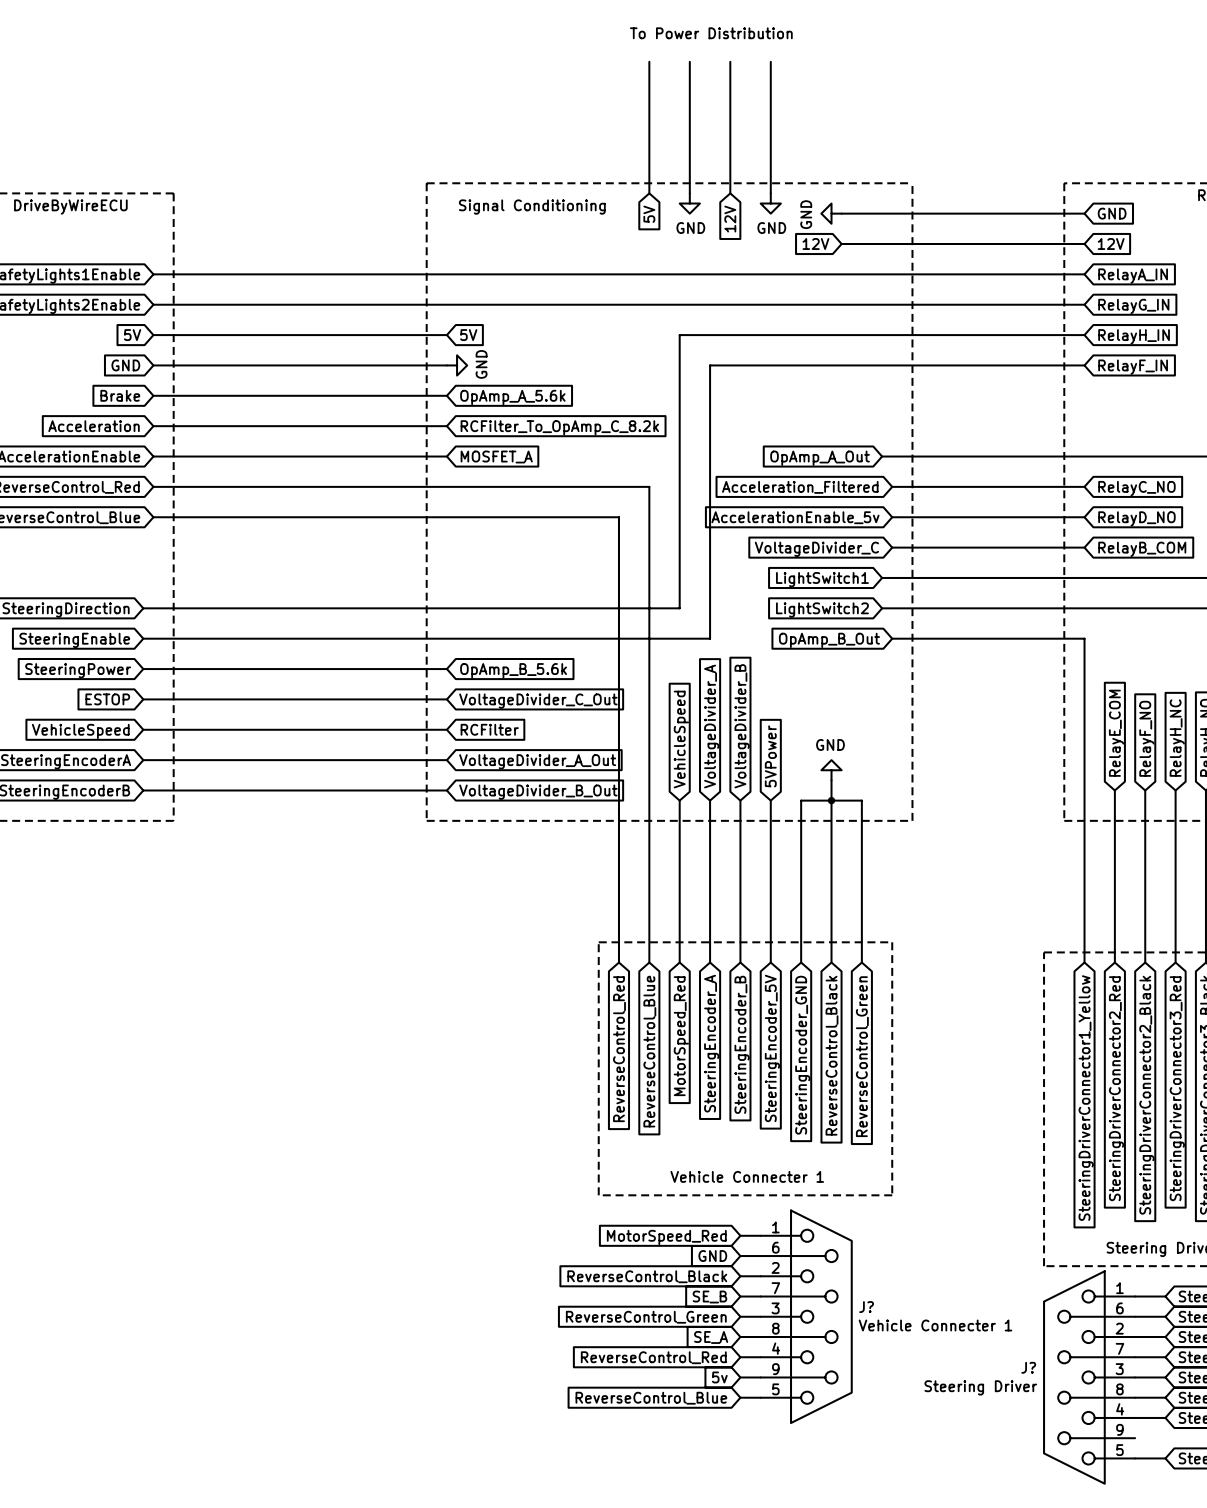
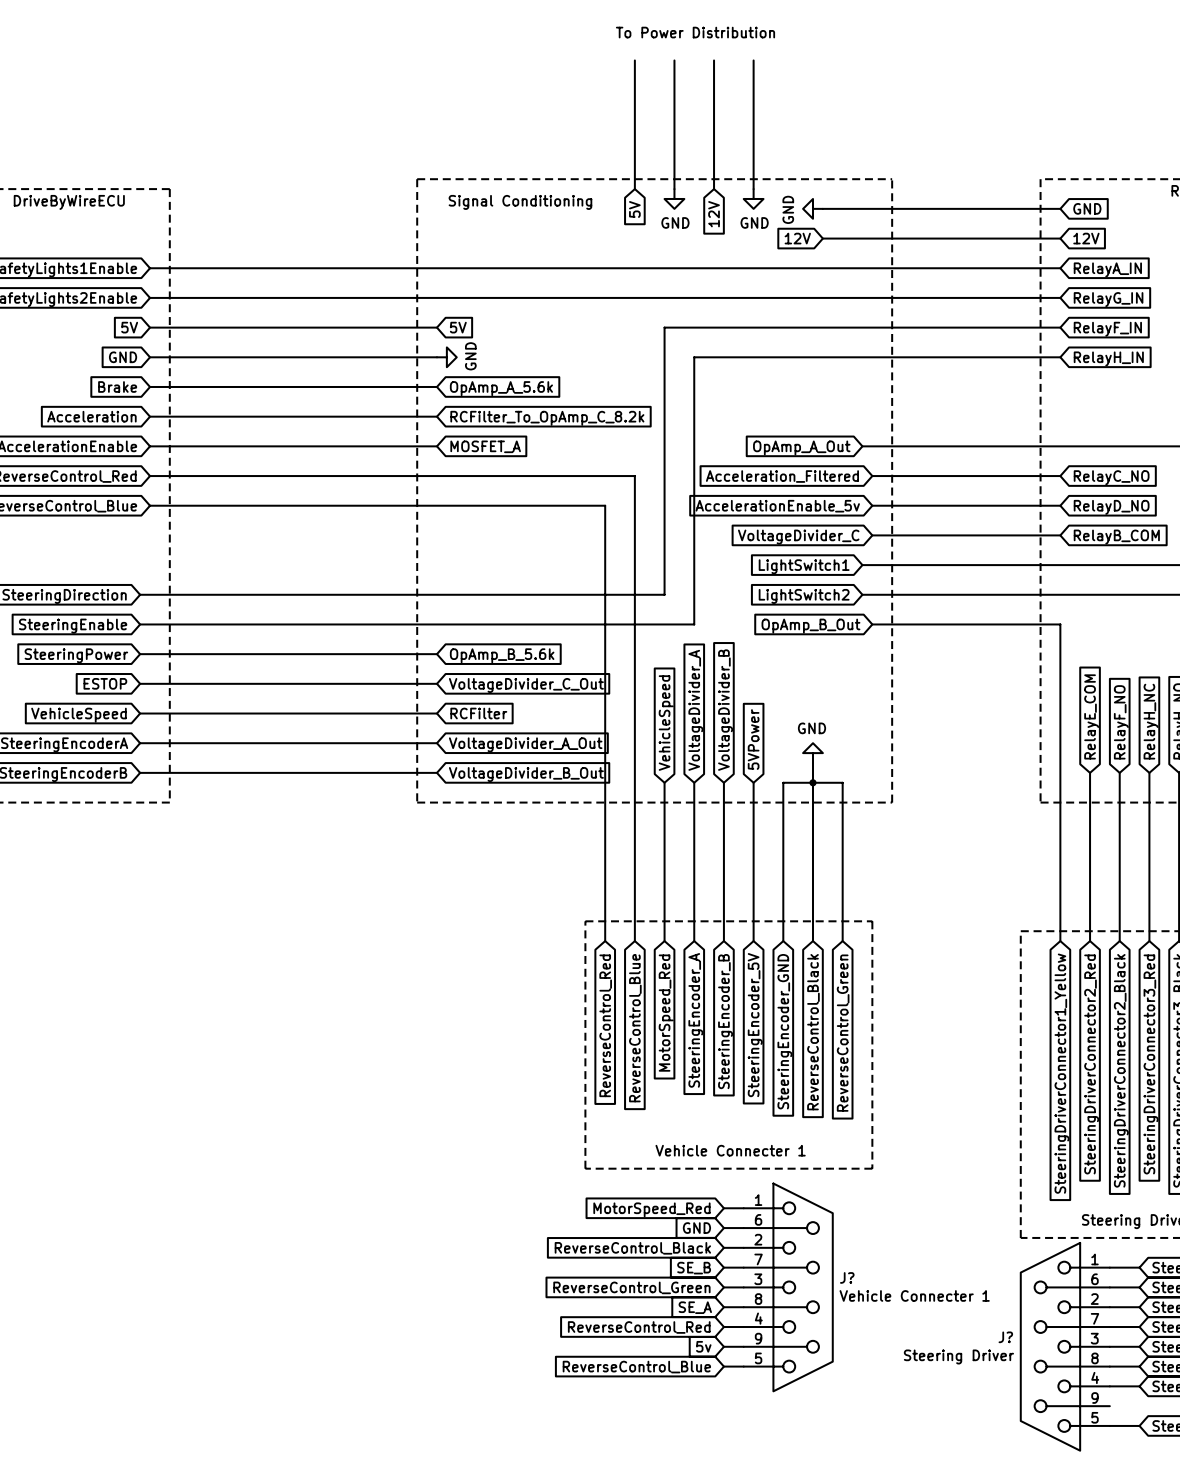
global label: RelayH_IN (1134, 336) -> RelayF_IN (1107, 329)
global label: RelayF_IN (1133, 367) -> RelayH_IN (1108, 358)

